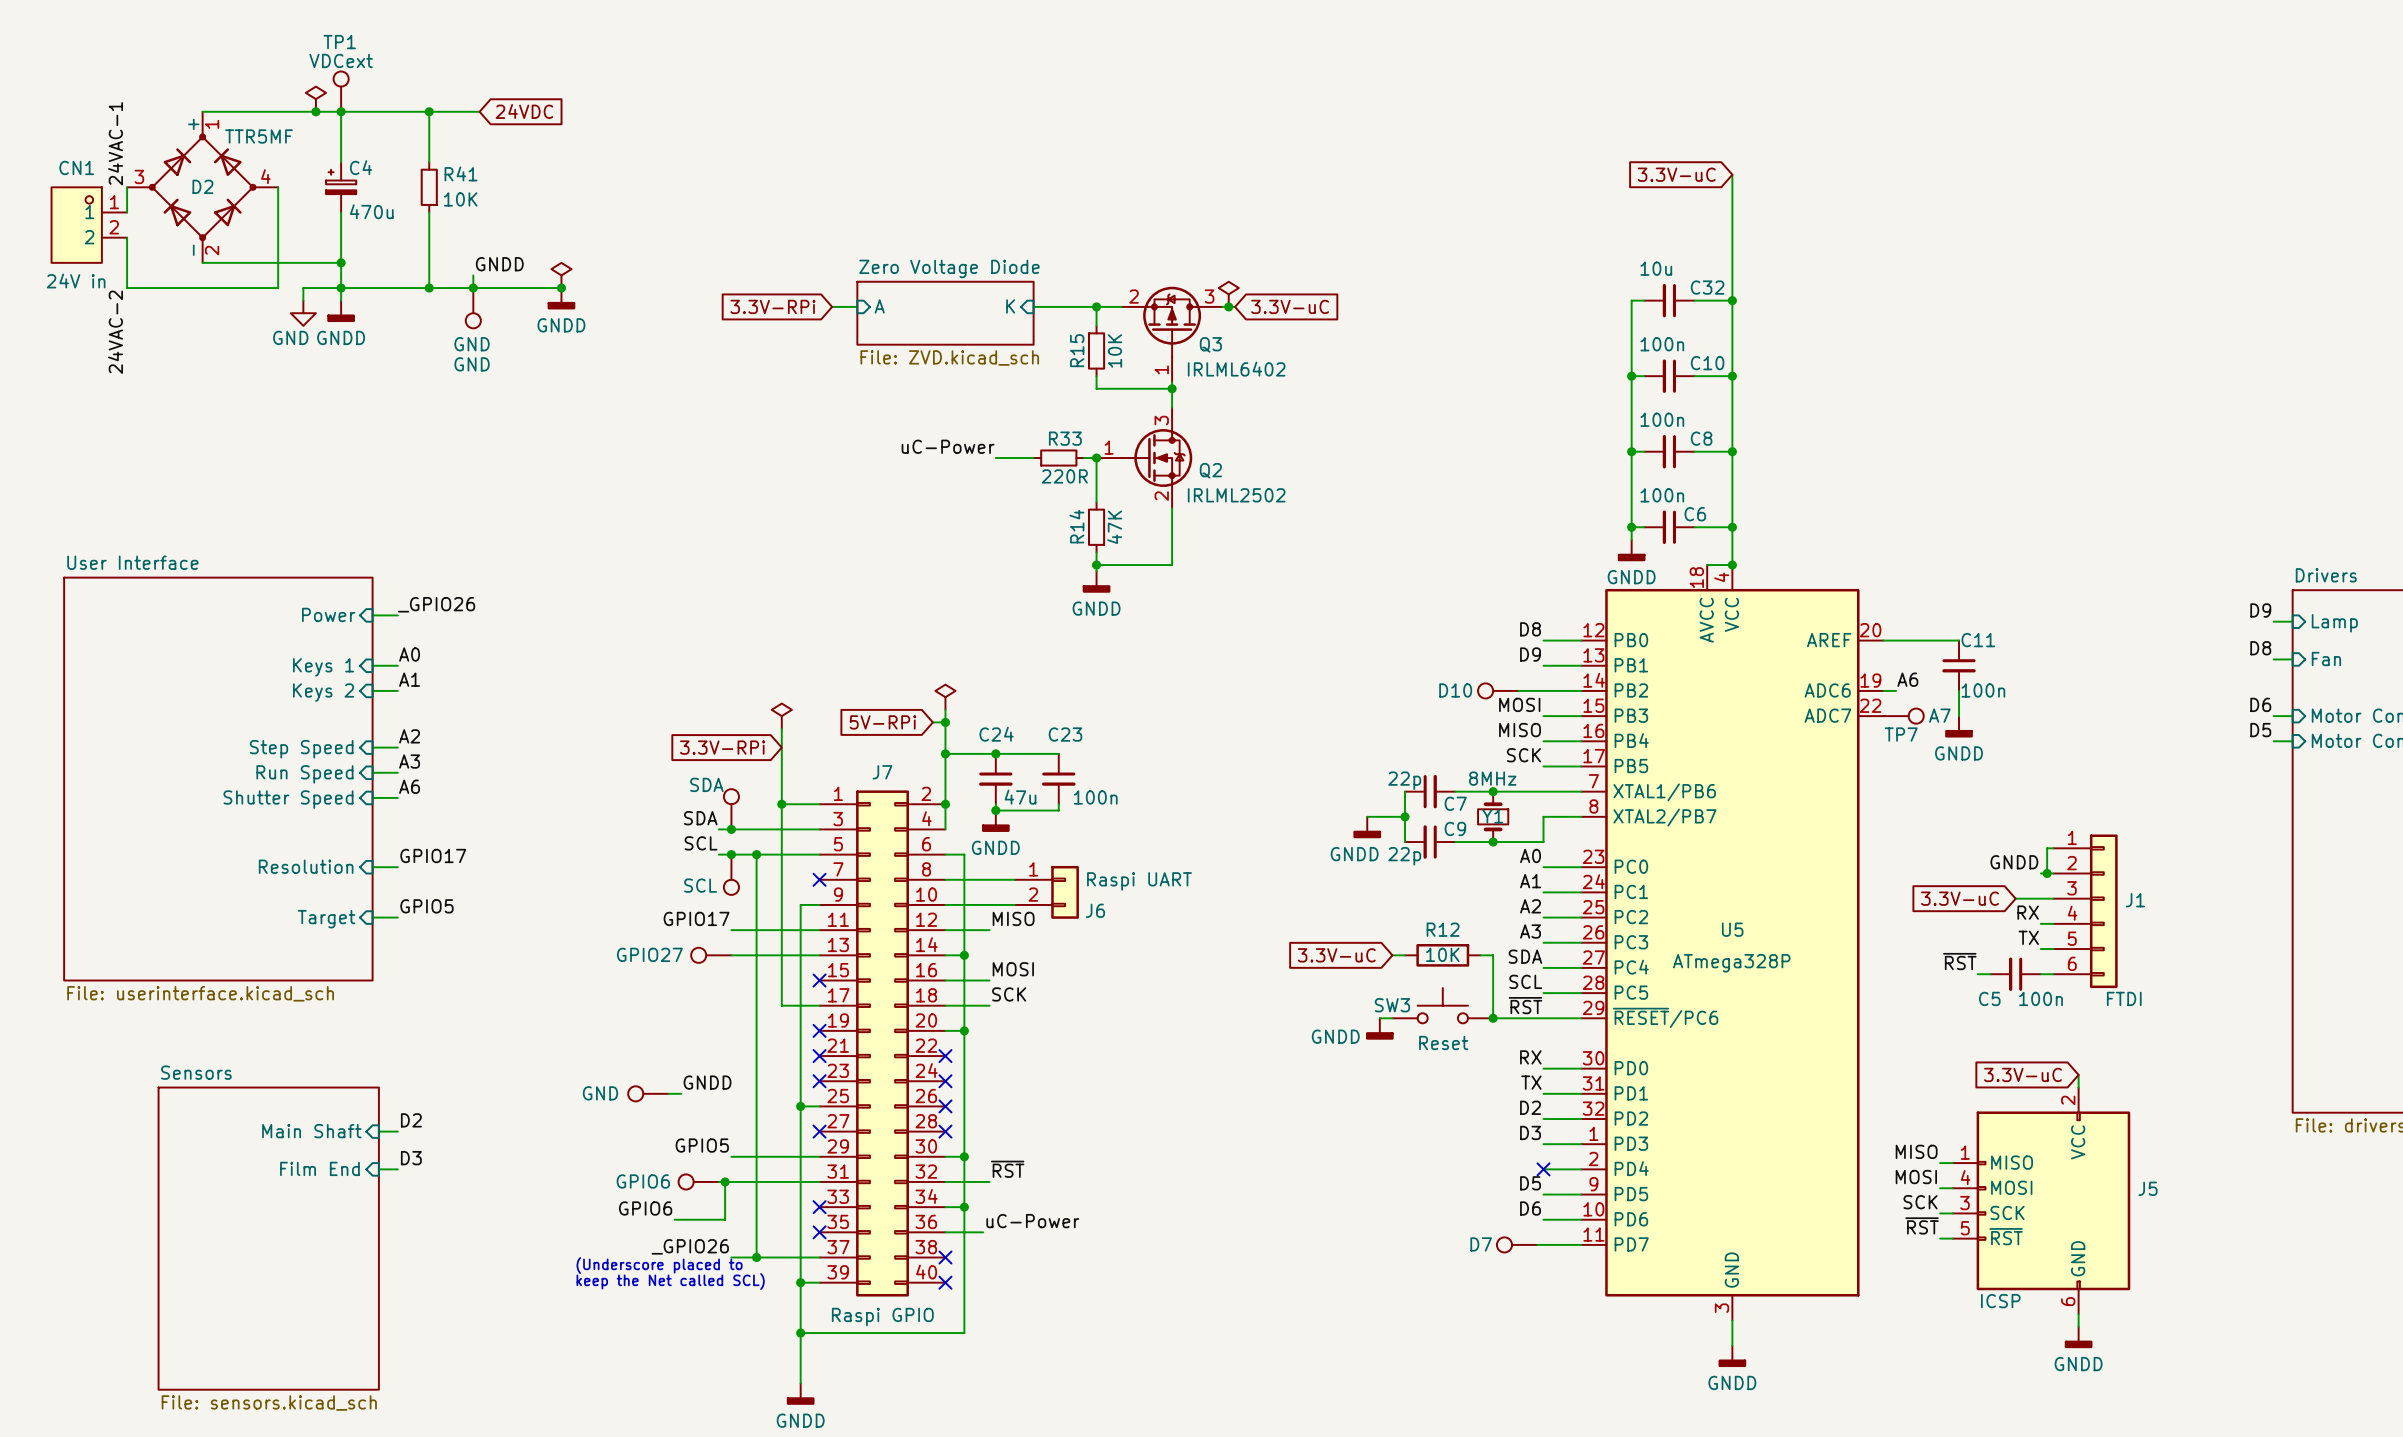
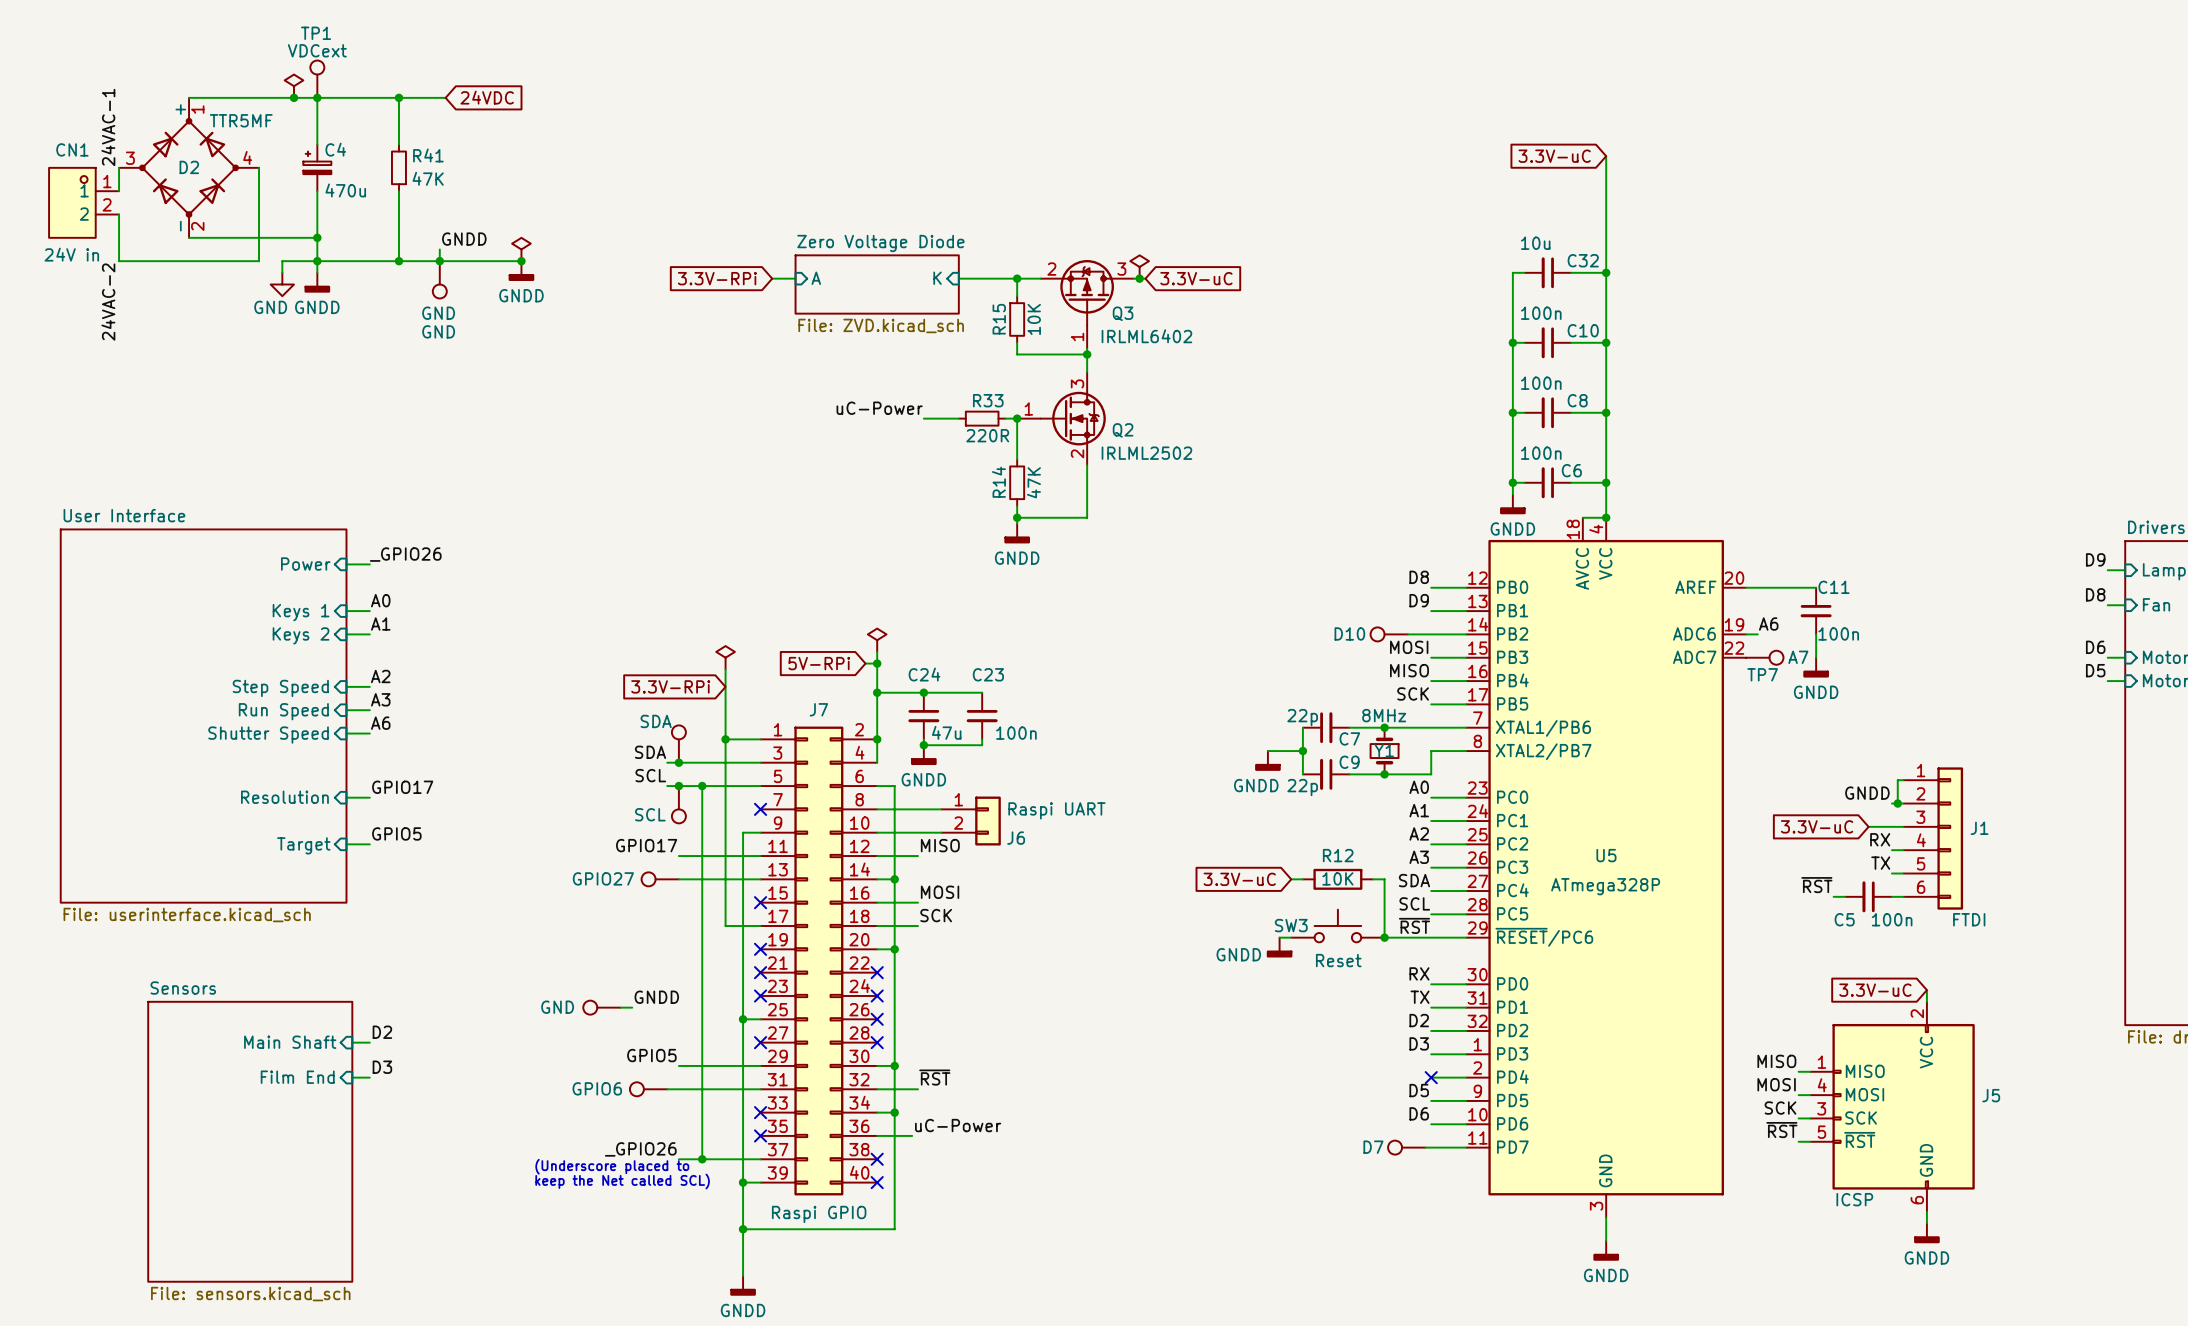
R41 value: 10K (460, 199) -> 47K (428, 178)
wire: (725, 1181) (725, 1219) (674, 1219) -> none
junction: (725, 1181) -> none
label: GPIO6 (645, 1208) -> none

